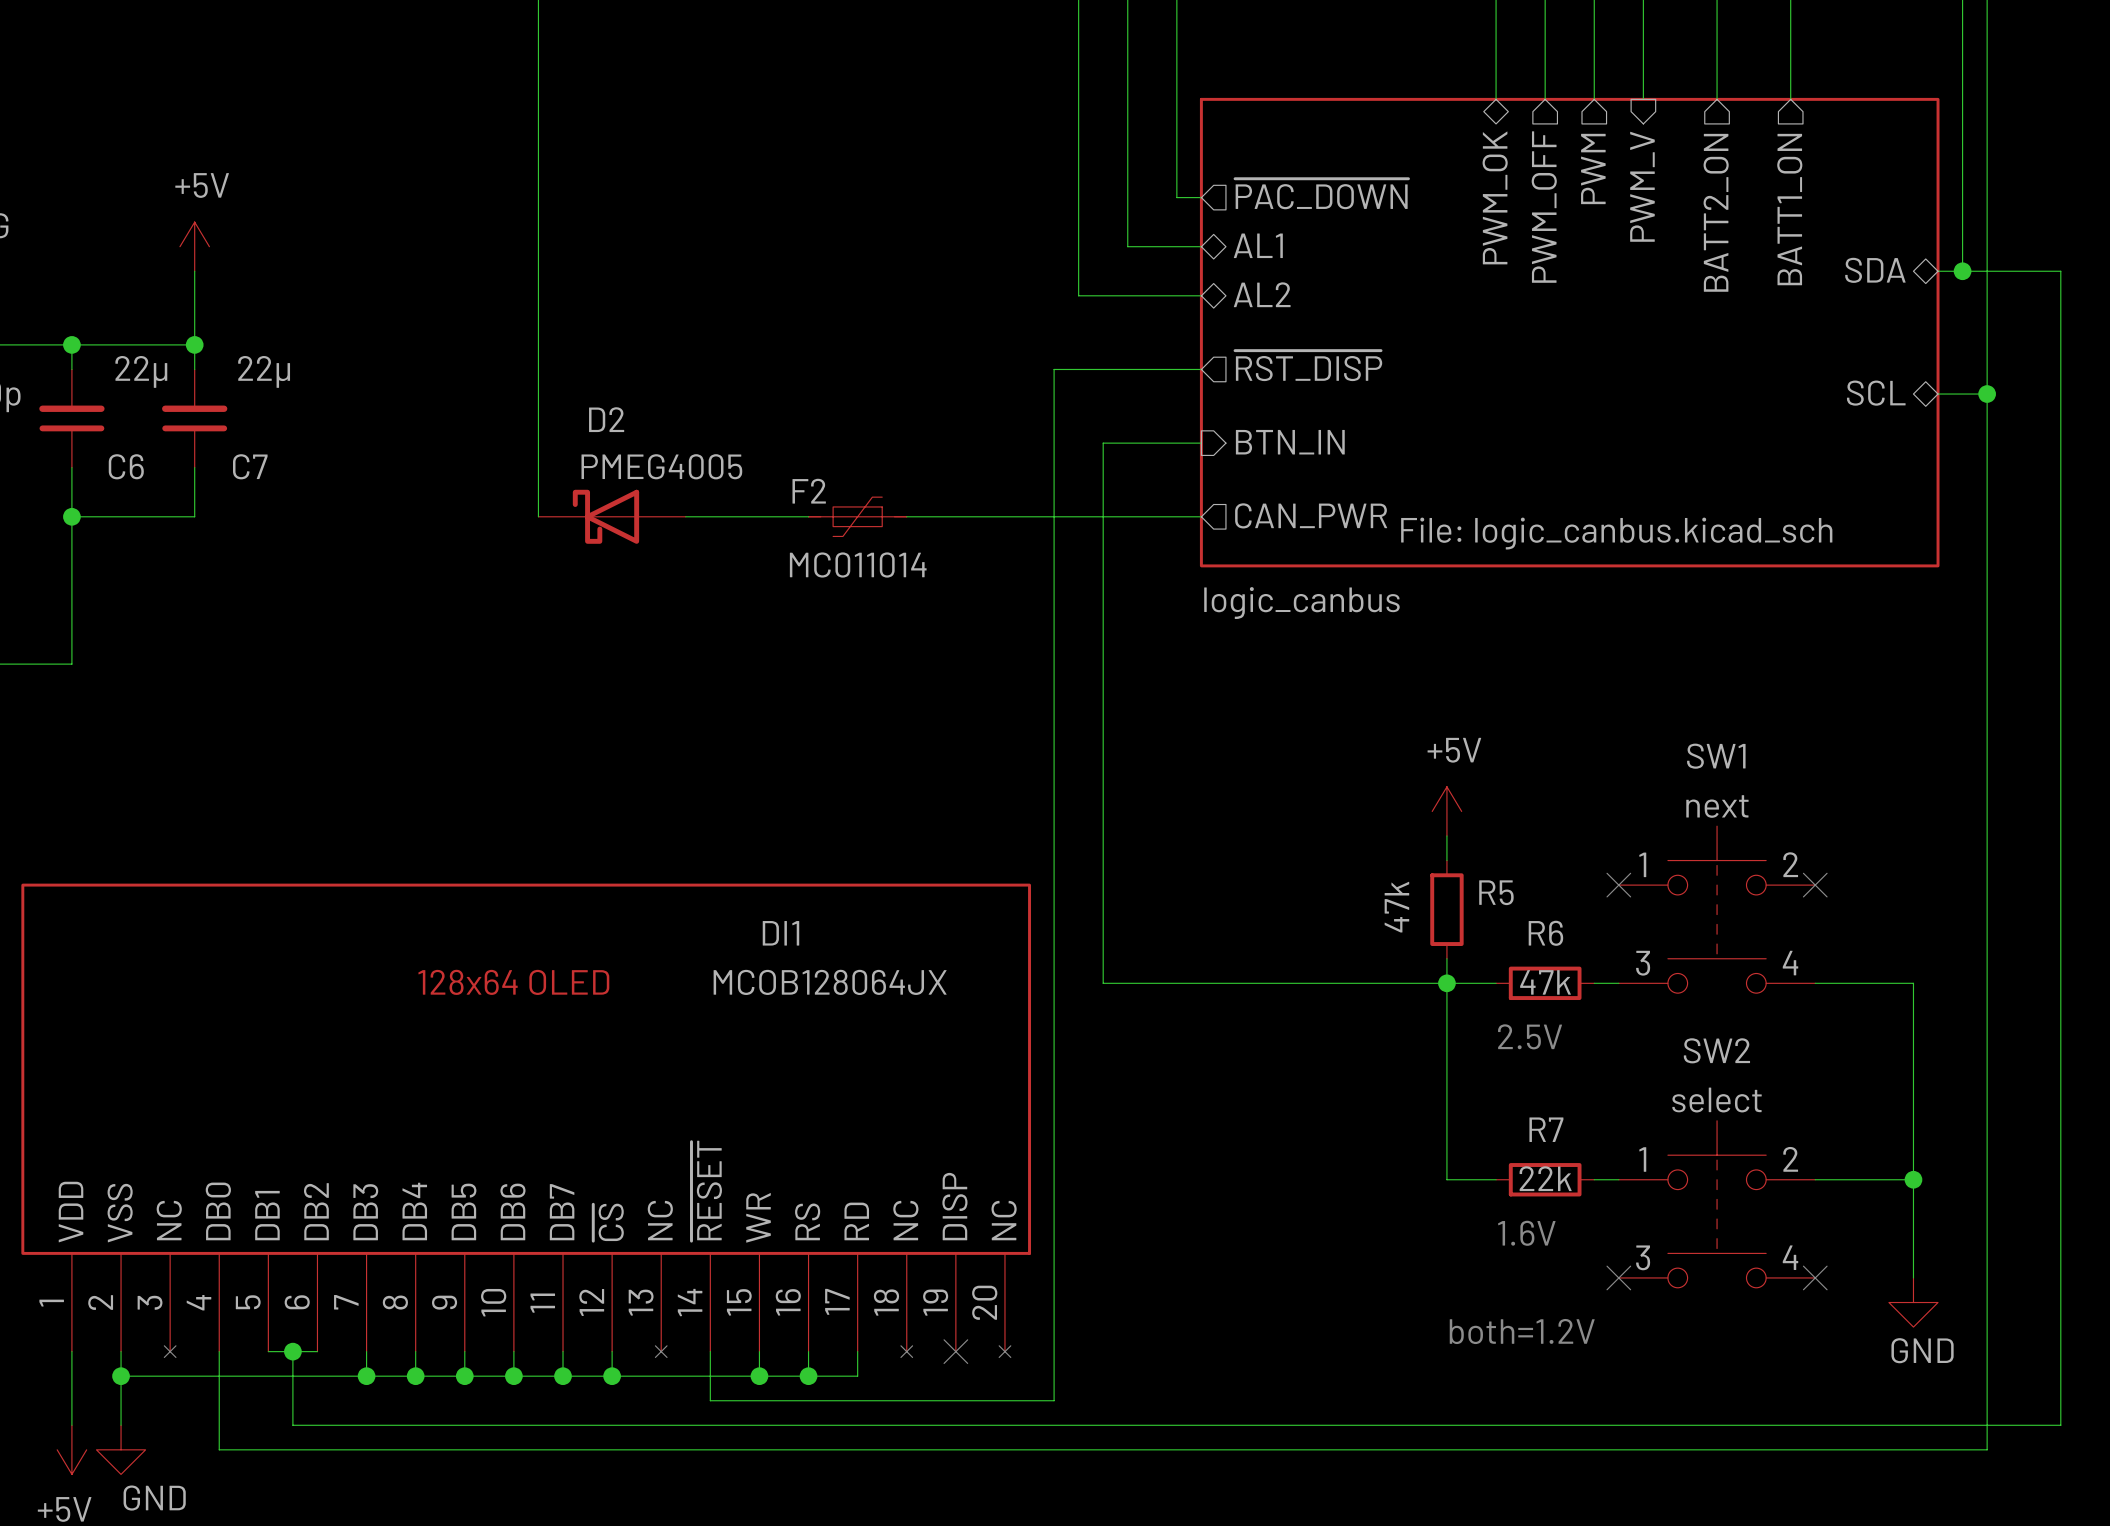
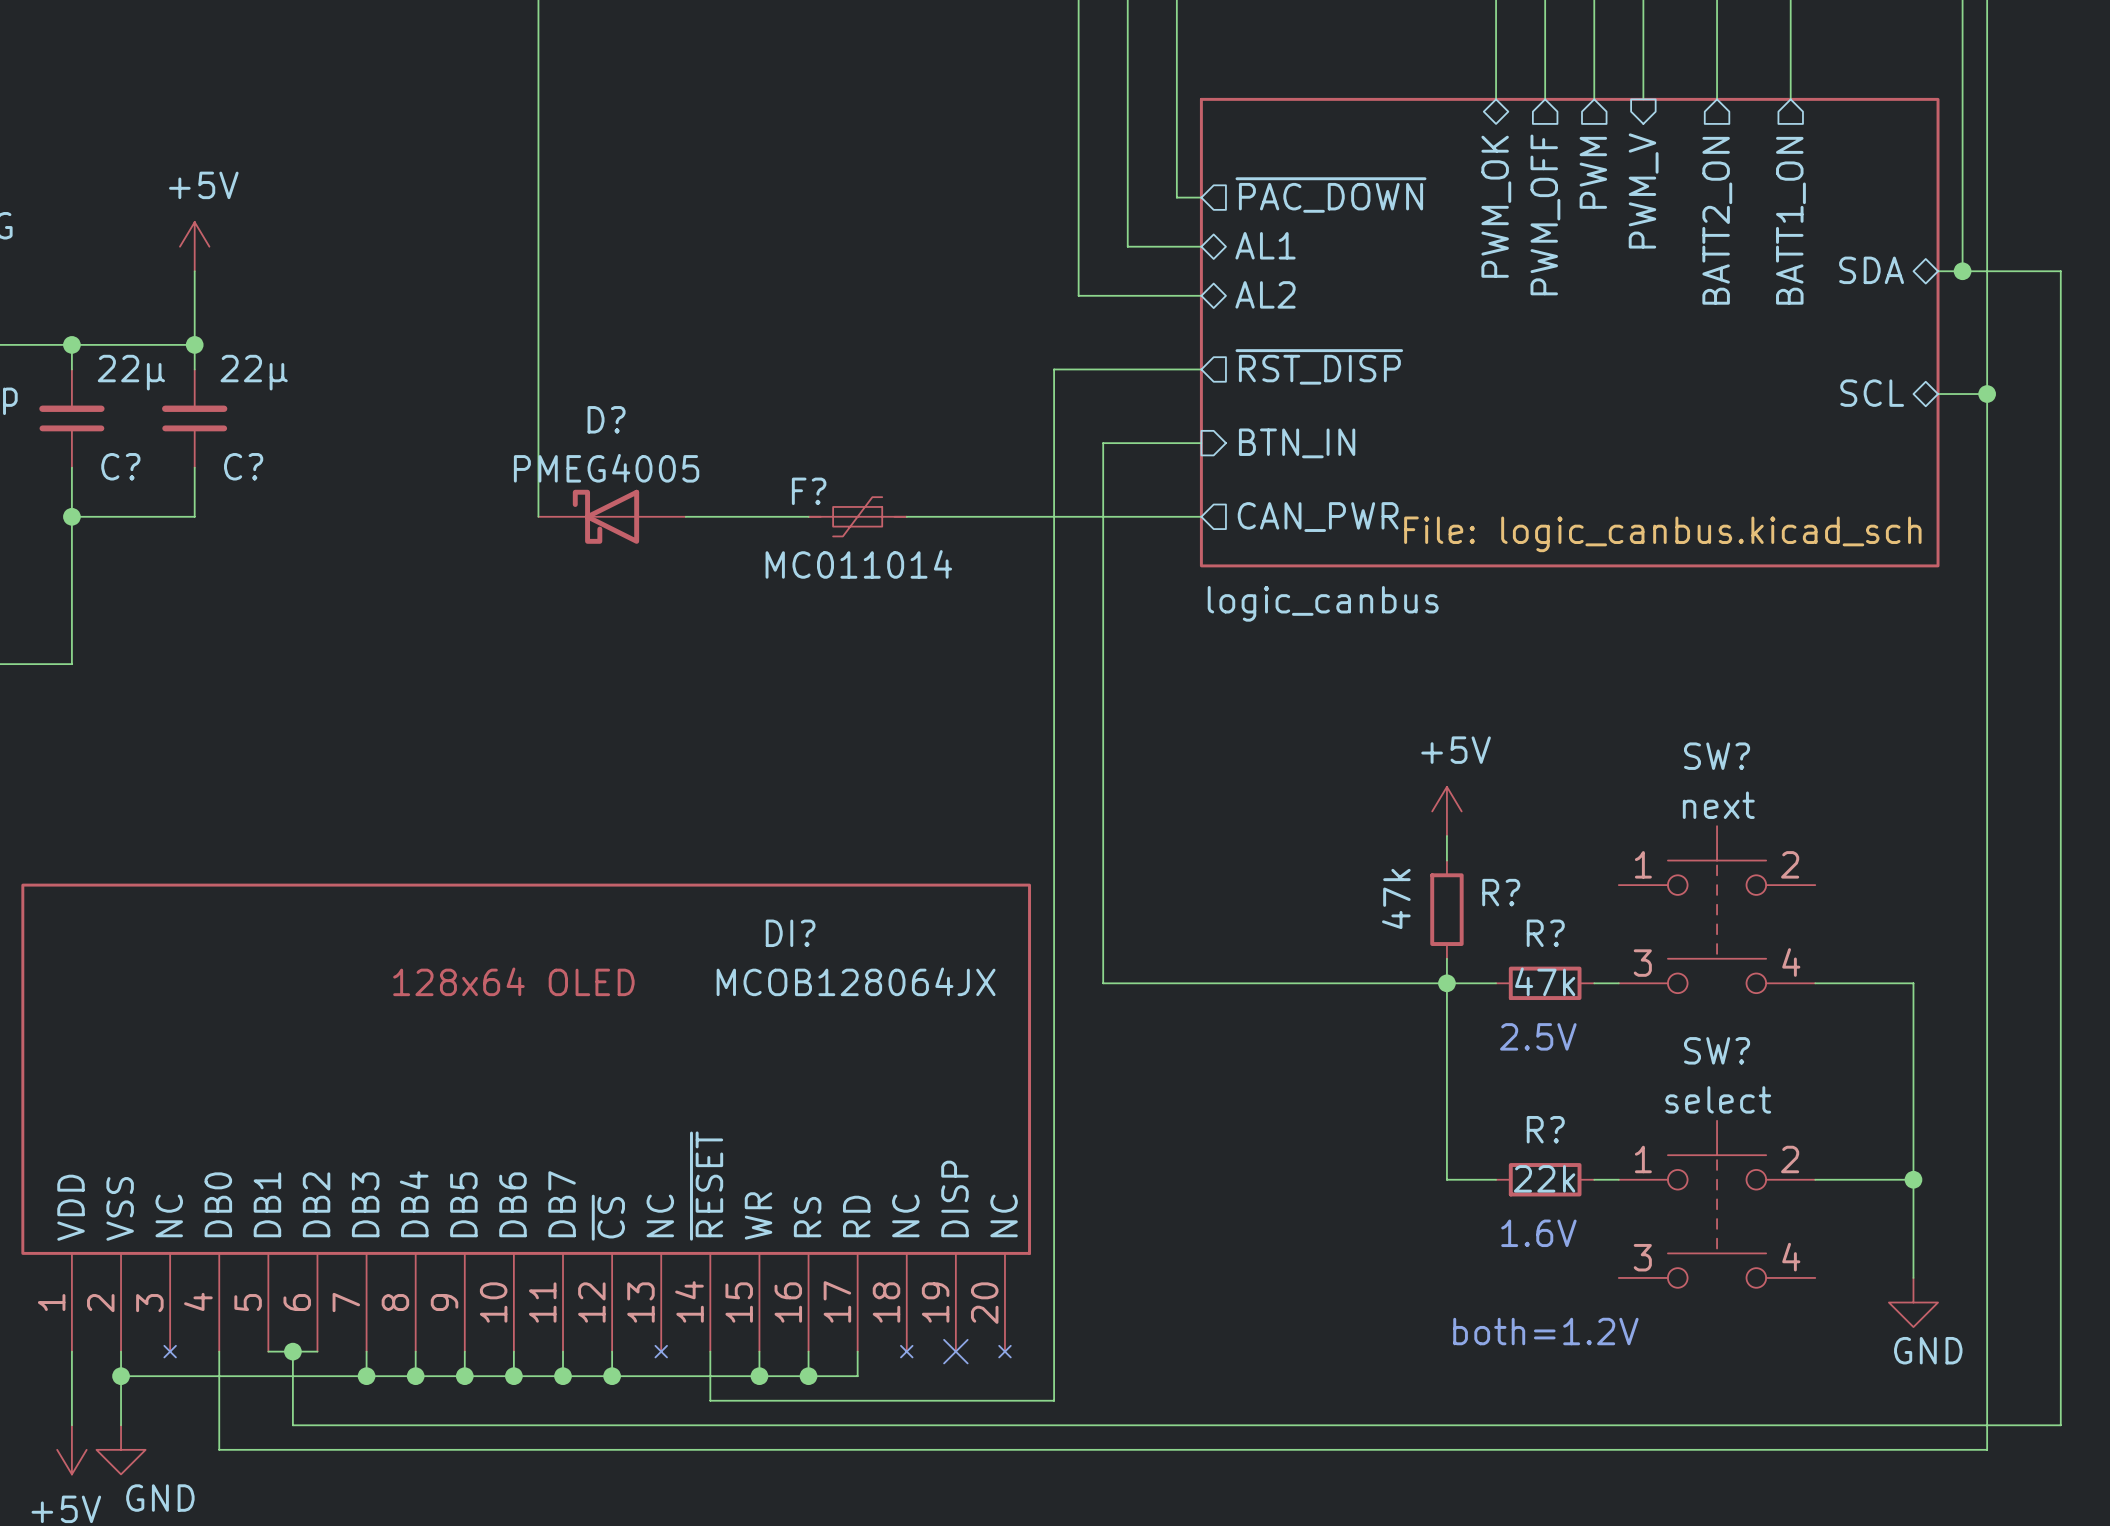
D2 name: D2 (606, 419) -> D? (606, 419)
C6 name: C6 (126, 466) -> C? (120, 466)
C7 name: C7 (250, 466) -> C? (243, 466)
D2 value position: PMEG4005 (661, 466) -> PMEG4005 (606, 468)
F2 name: F2 (809, 491) -> F? (809, 491)
SW1 name: SW1 (1716, 756) -> SW? (1717, 756)
no-connect mark: (1618, 885) -> none
no-connect mark: (1815, 885) -> none
R5 name: R5 (1496, 892) -> R? (1501, 892)
DI1 name: DI1 (780, 933) -> DI? (790, 933)
R6 name: R6 (1545, 933) -> R? (1545, 933)
SW2 name: SW2 (1716, 1050) -> SW? (1717, 1050)
R7 name: R7 (1546, 1129) -> R? (1545, 1129)
no-connect mark: (1618, 1277) -> none
no-connect mark: (1815, 1277) -> none

